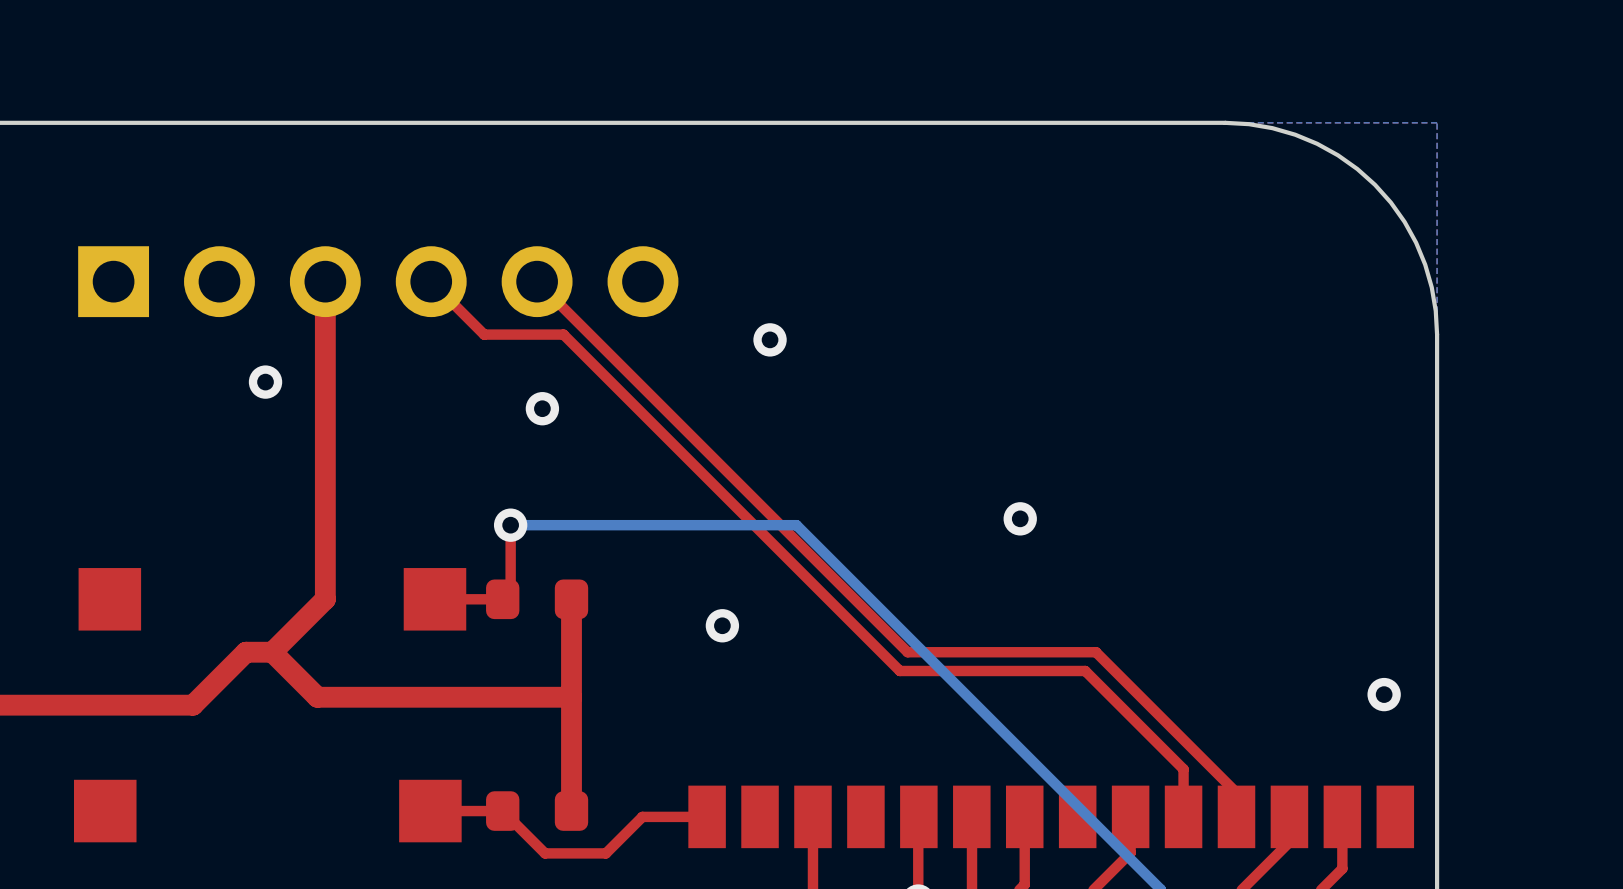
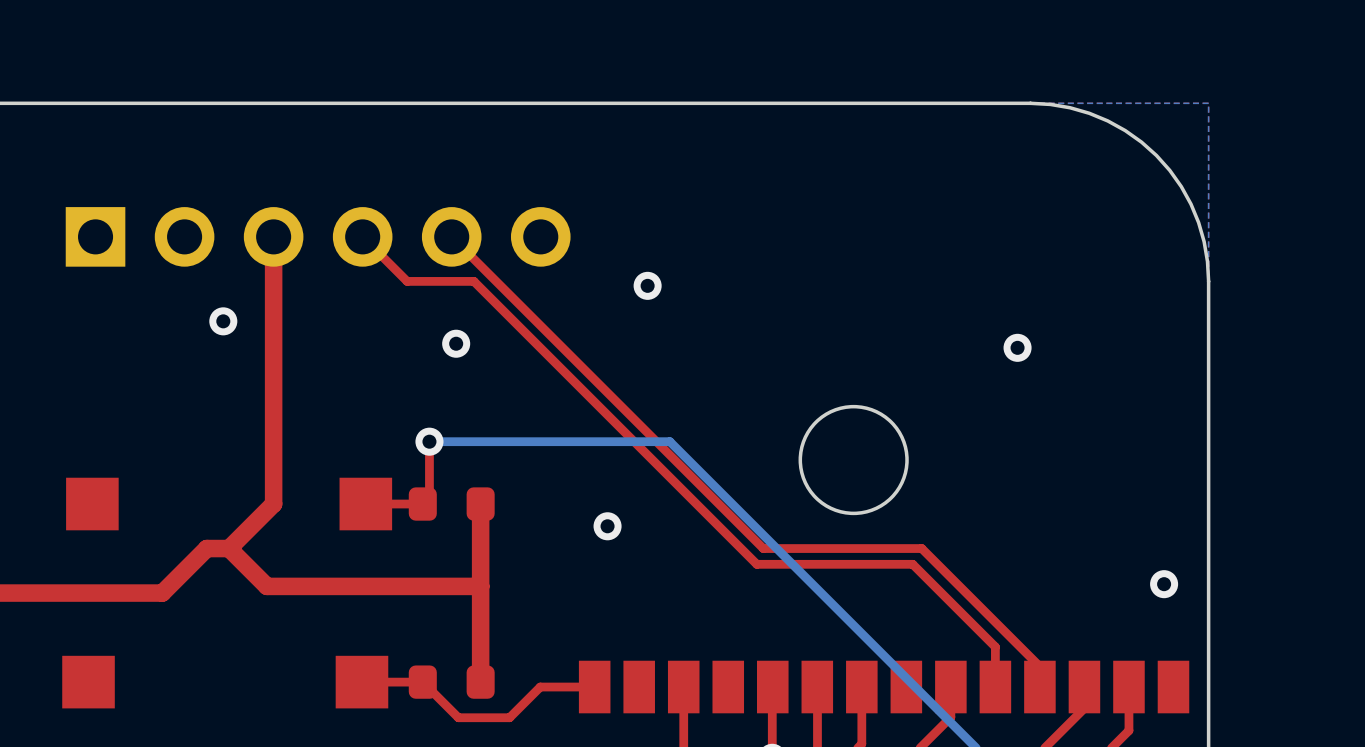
round board edge: none -> [798, 404, 909, 516]
via position: (1020, 518) -> (1017, 347)

